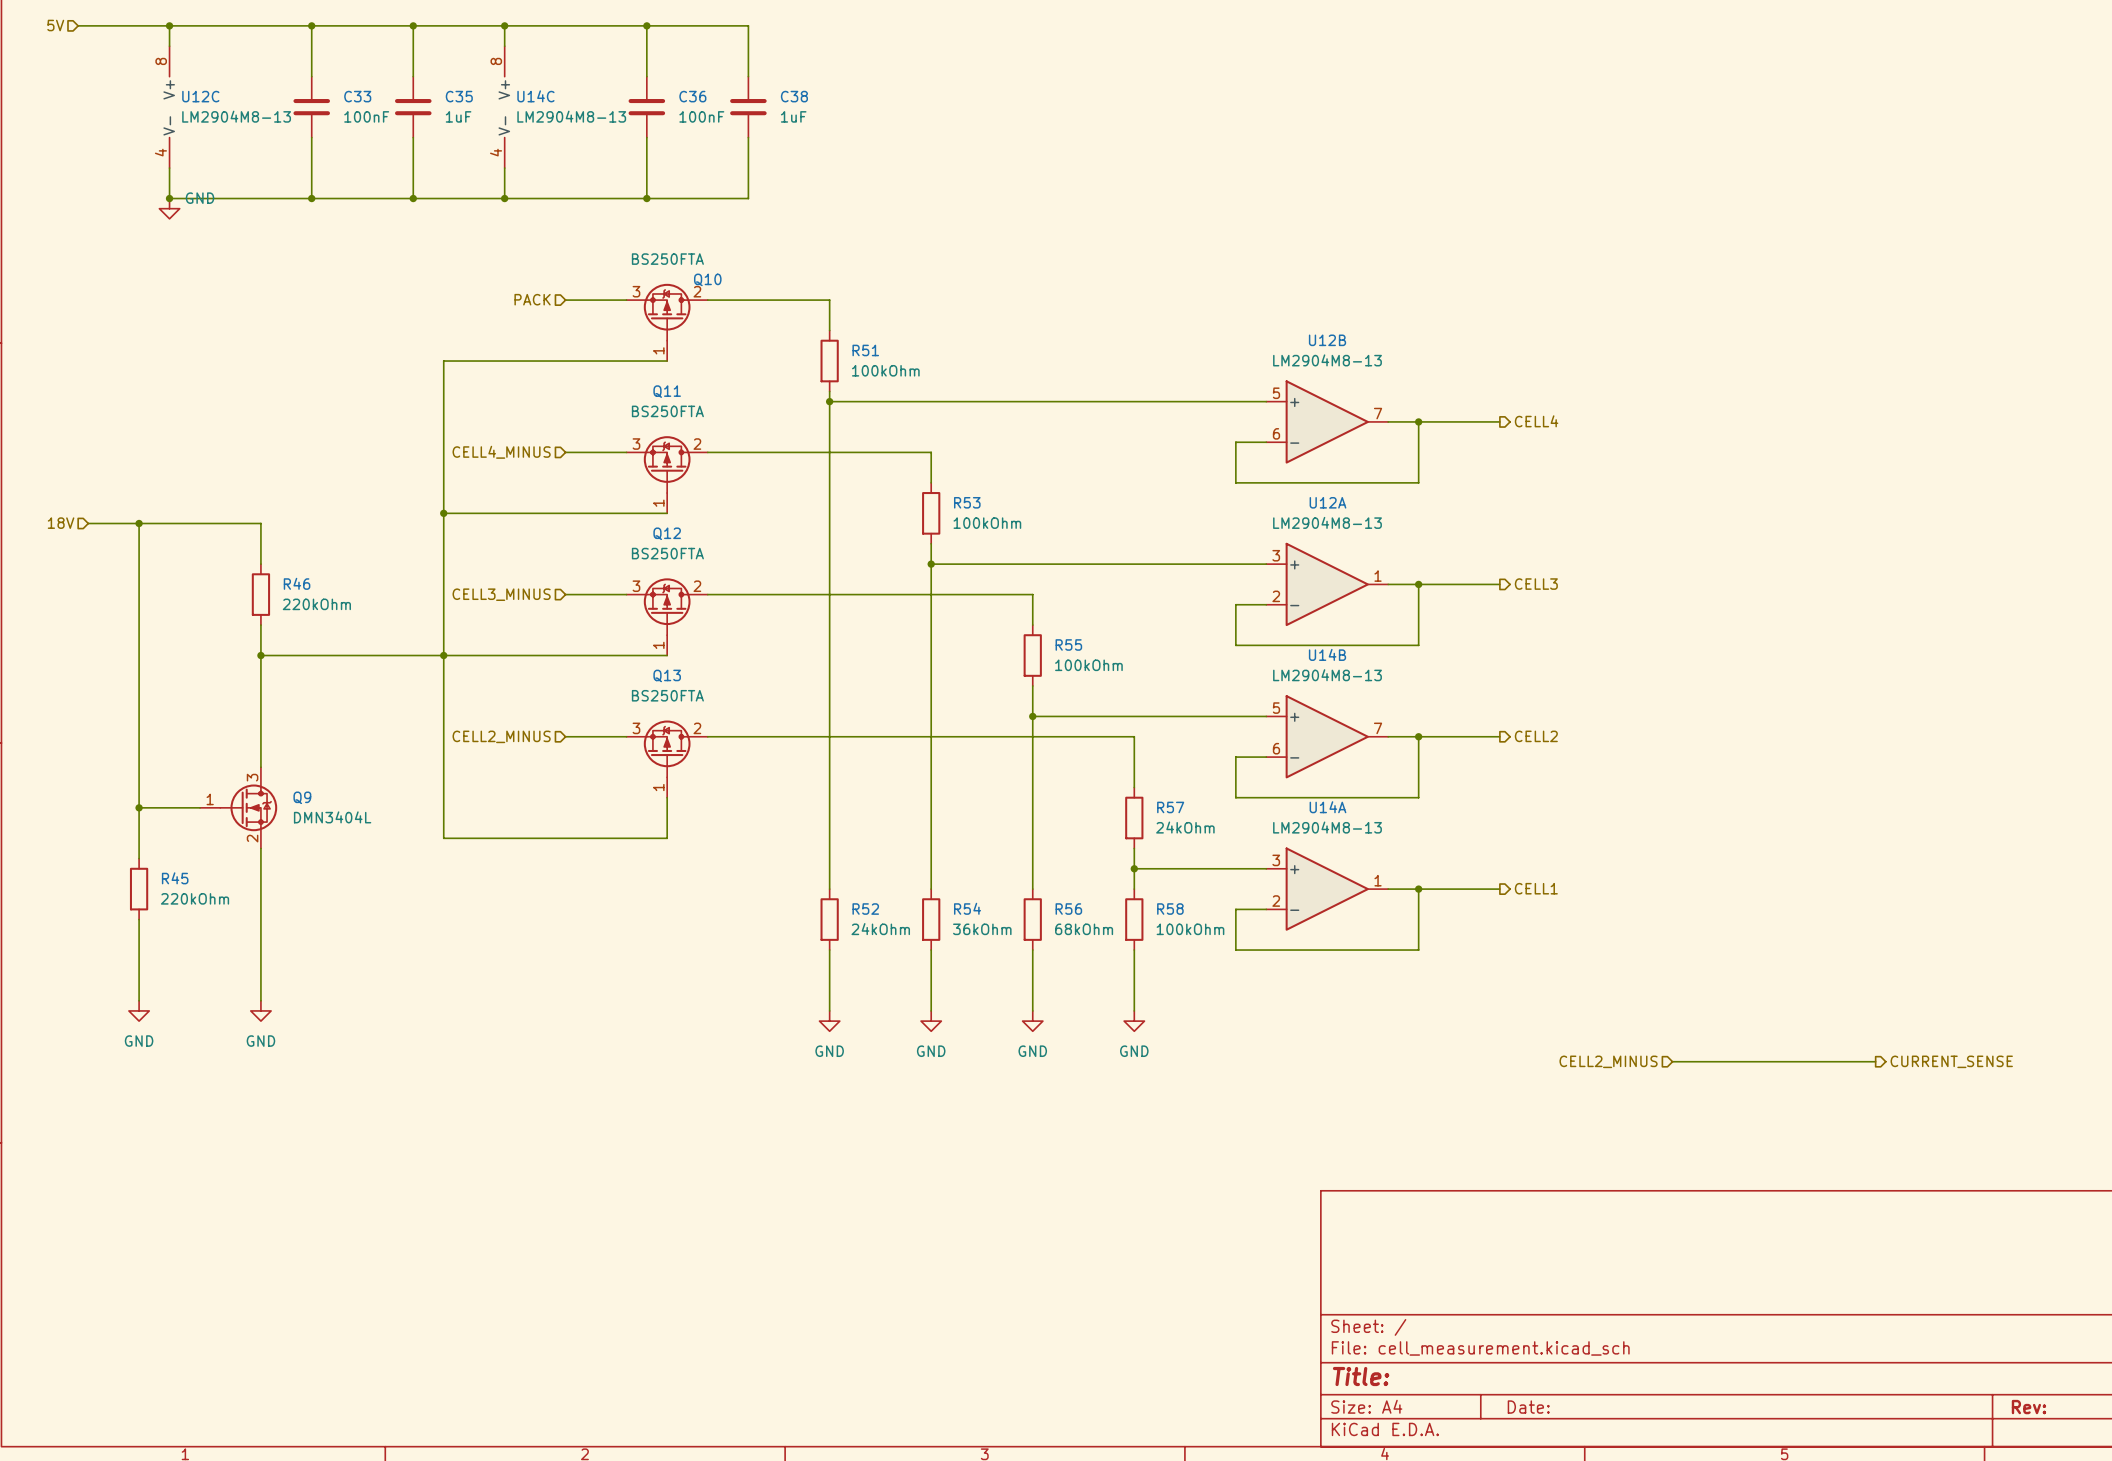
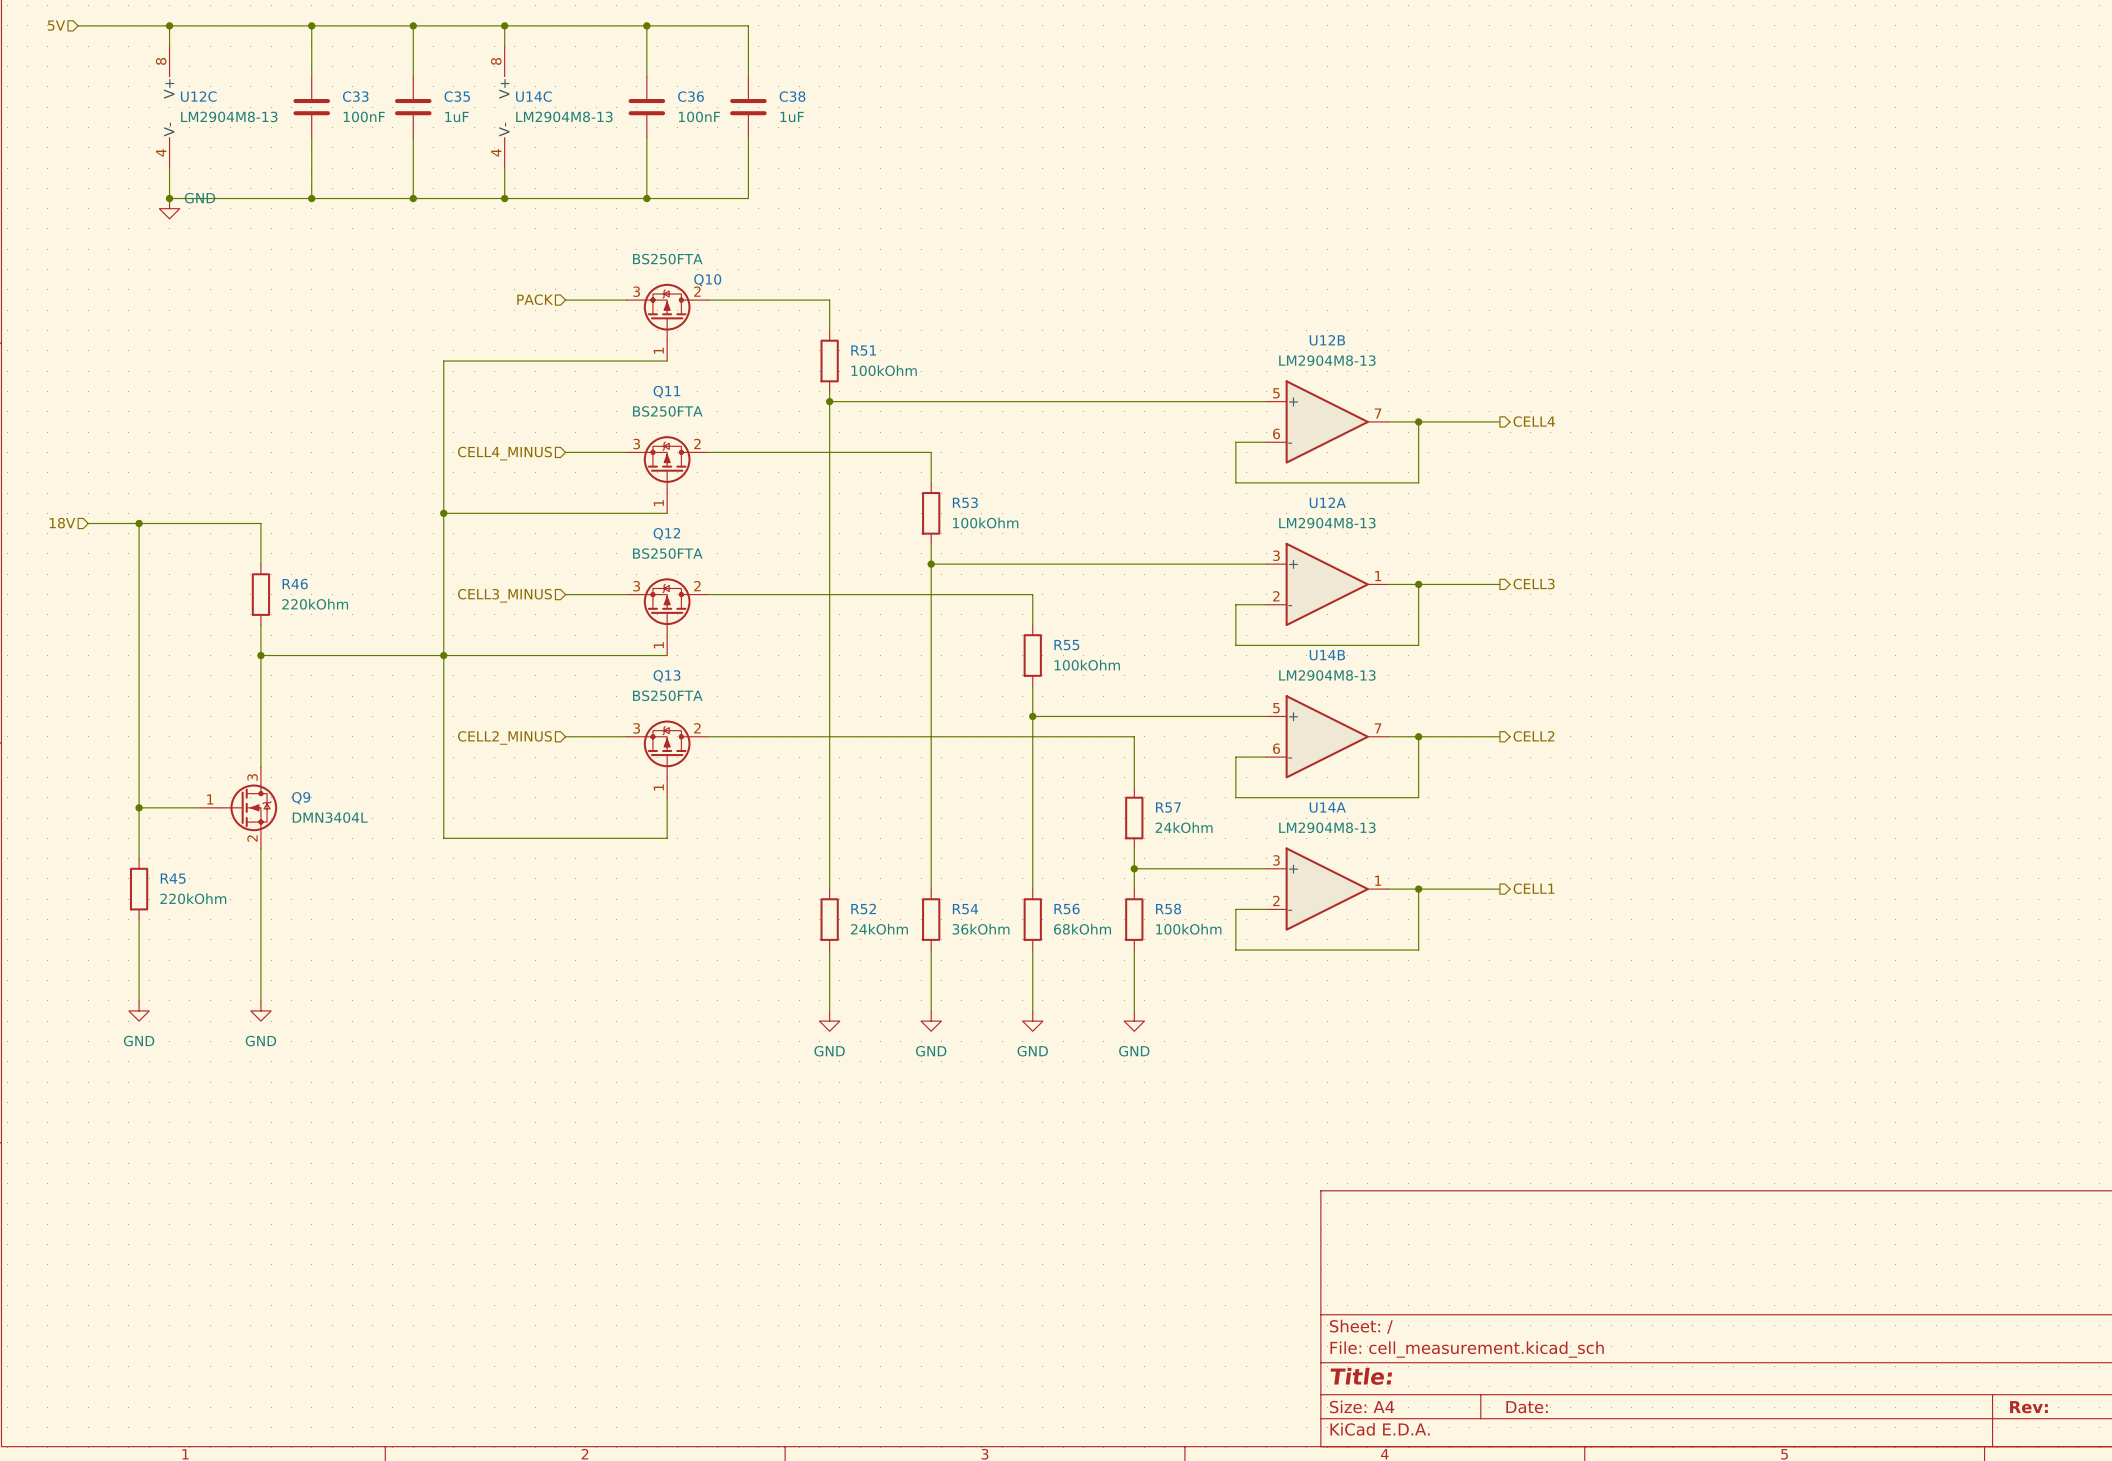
hierarchical label: CELL2_MINUS (1608, 1061) -> none
wire: (1672, 1061) (1875, 1061) -> none
hierarchical label: CURRENT_SENSE (1951, 1061) -> none

